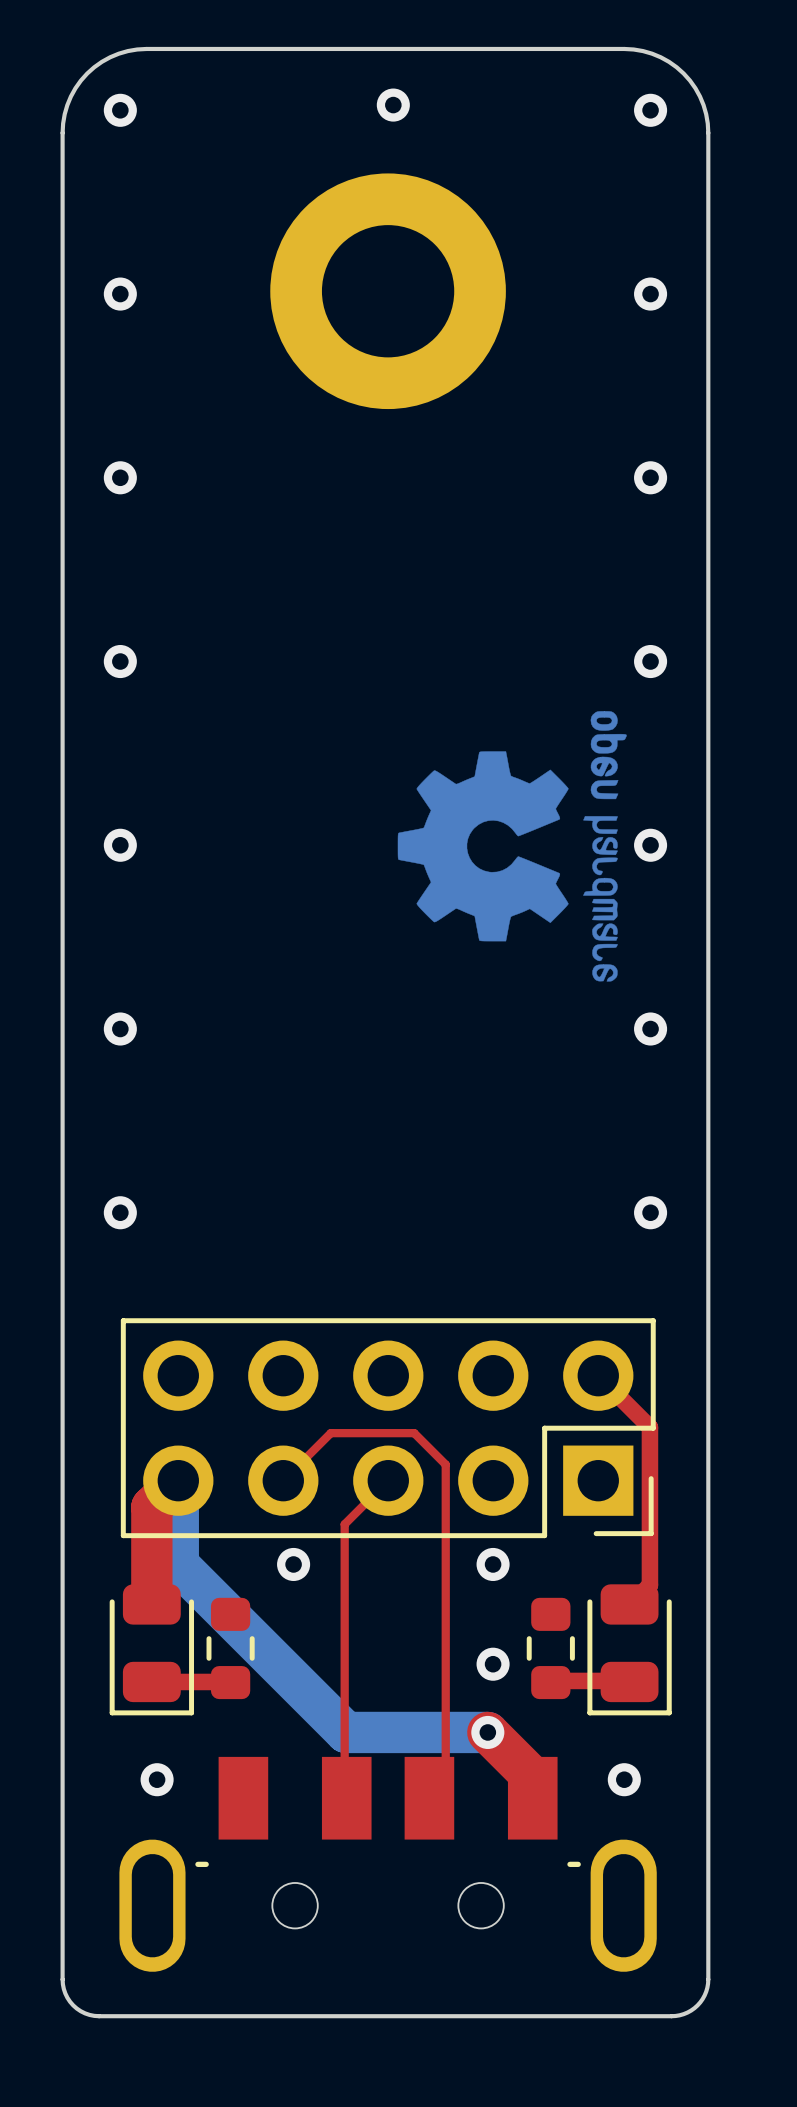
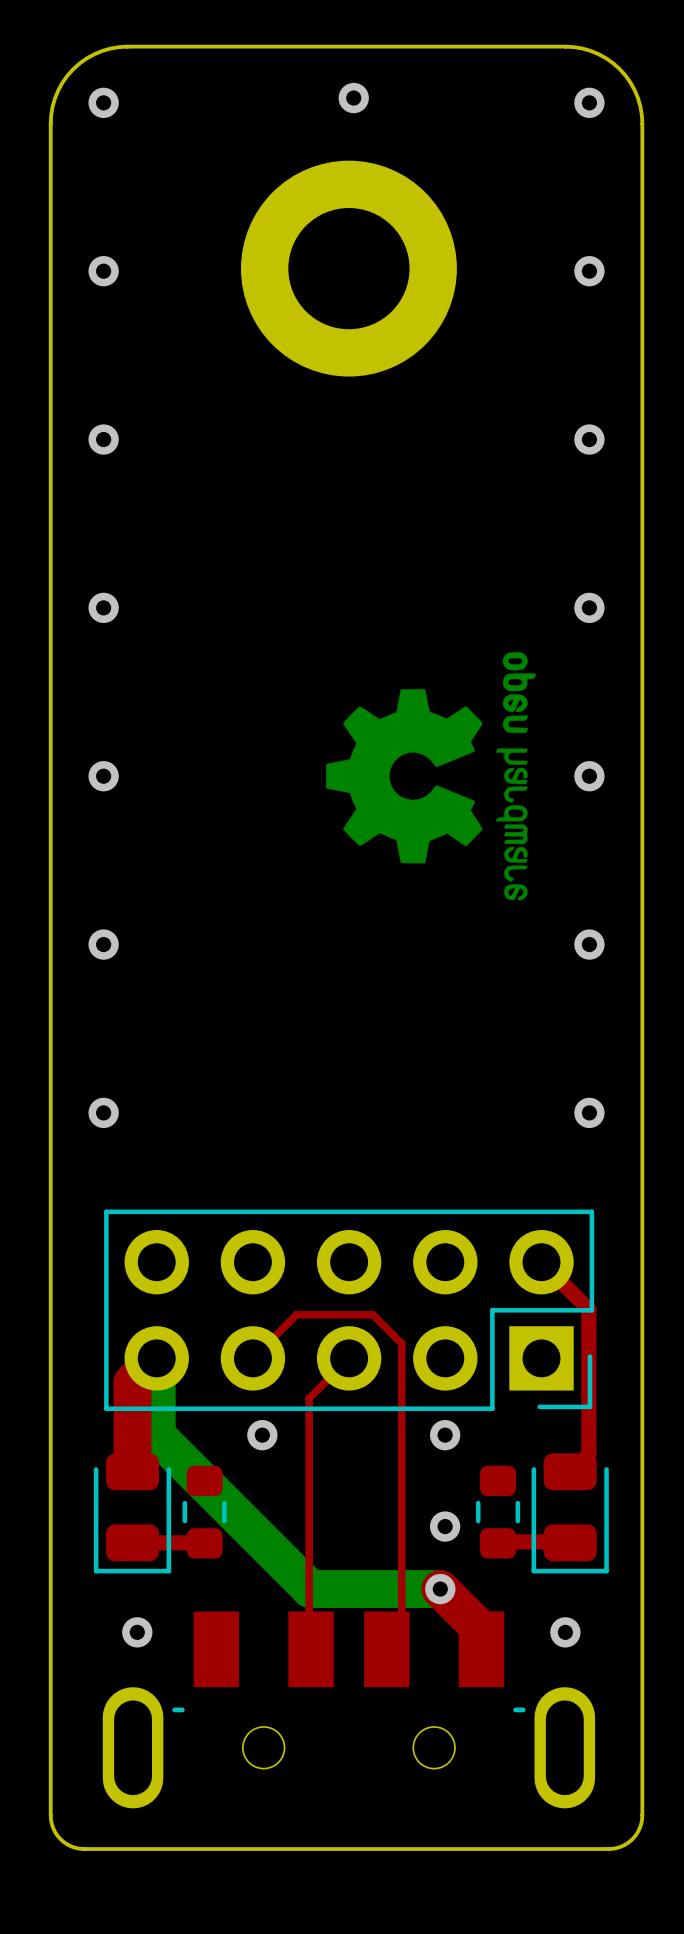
drawing position: (512, 846) -> (430, 776)

